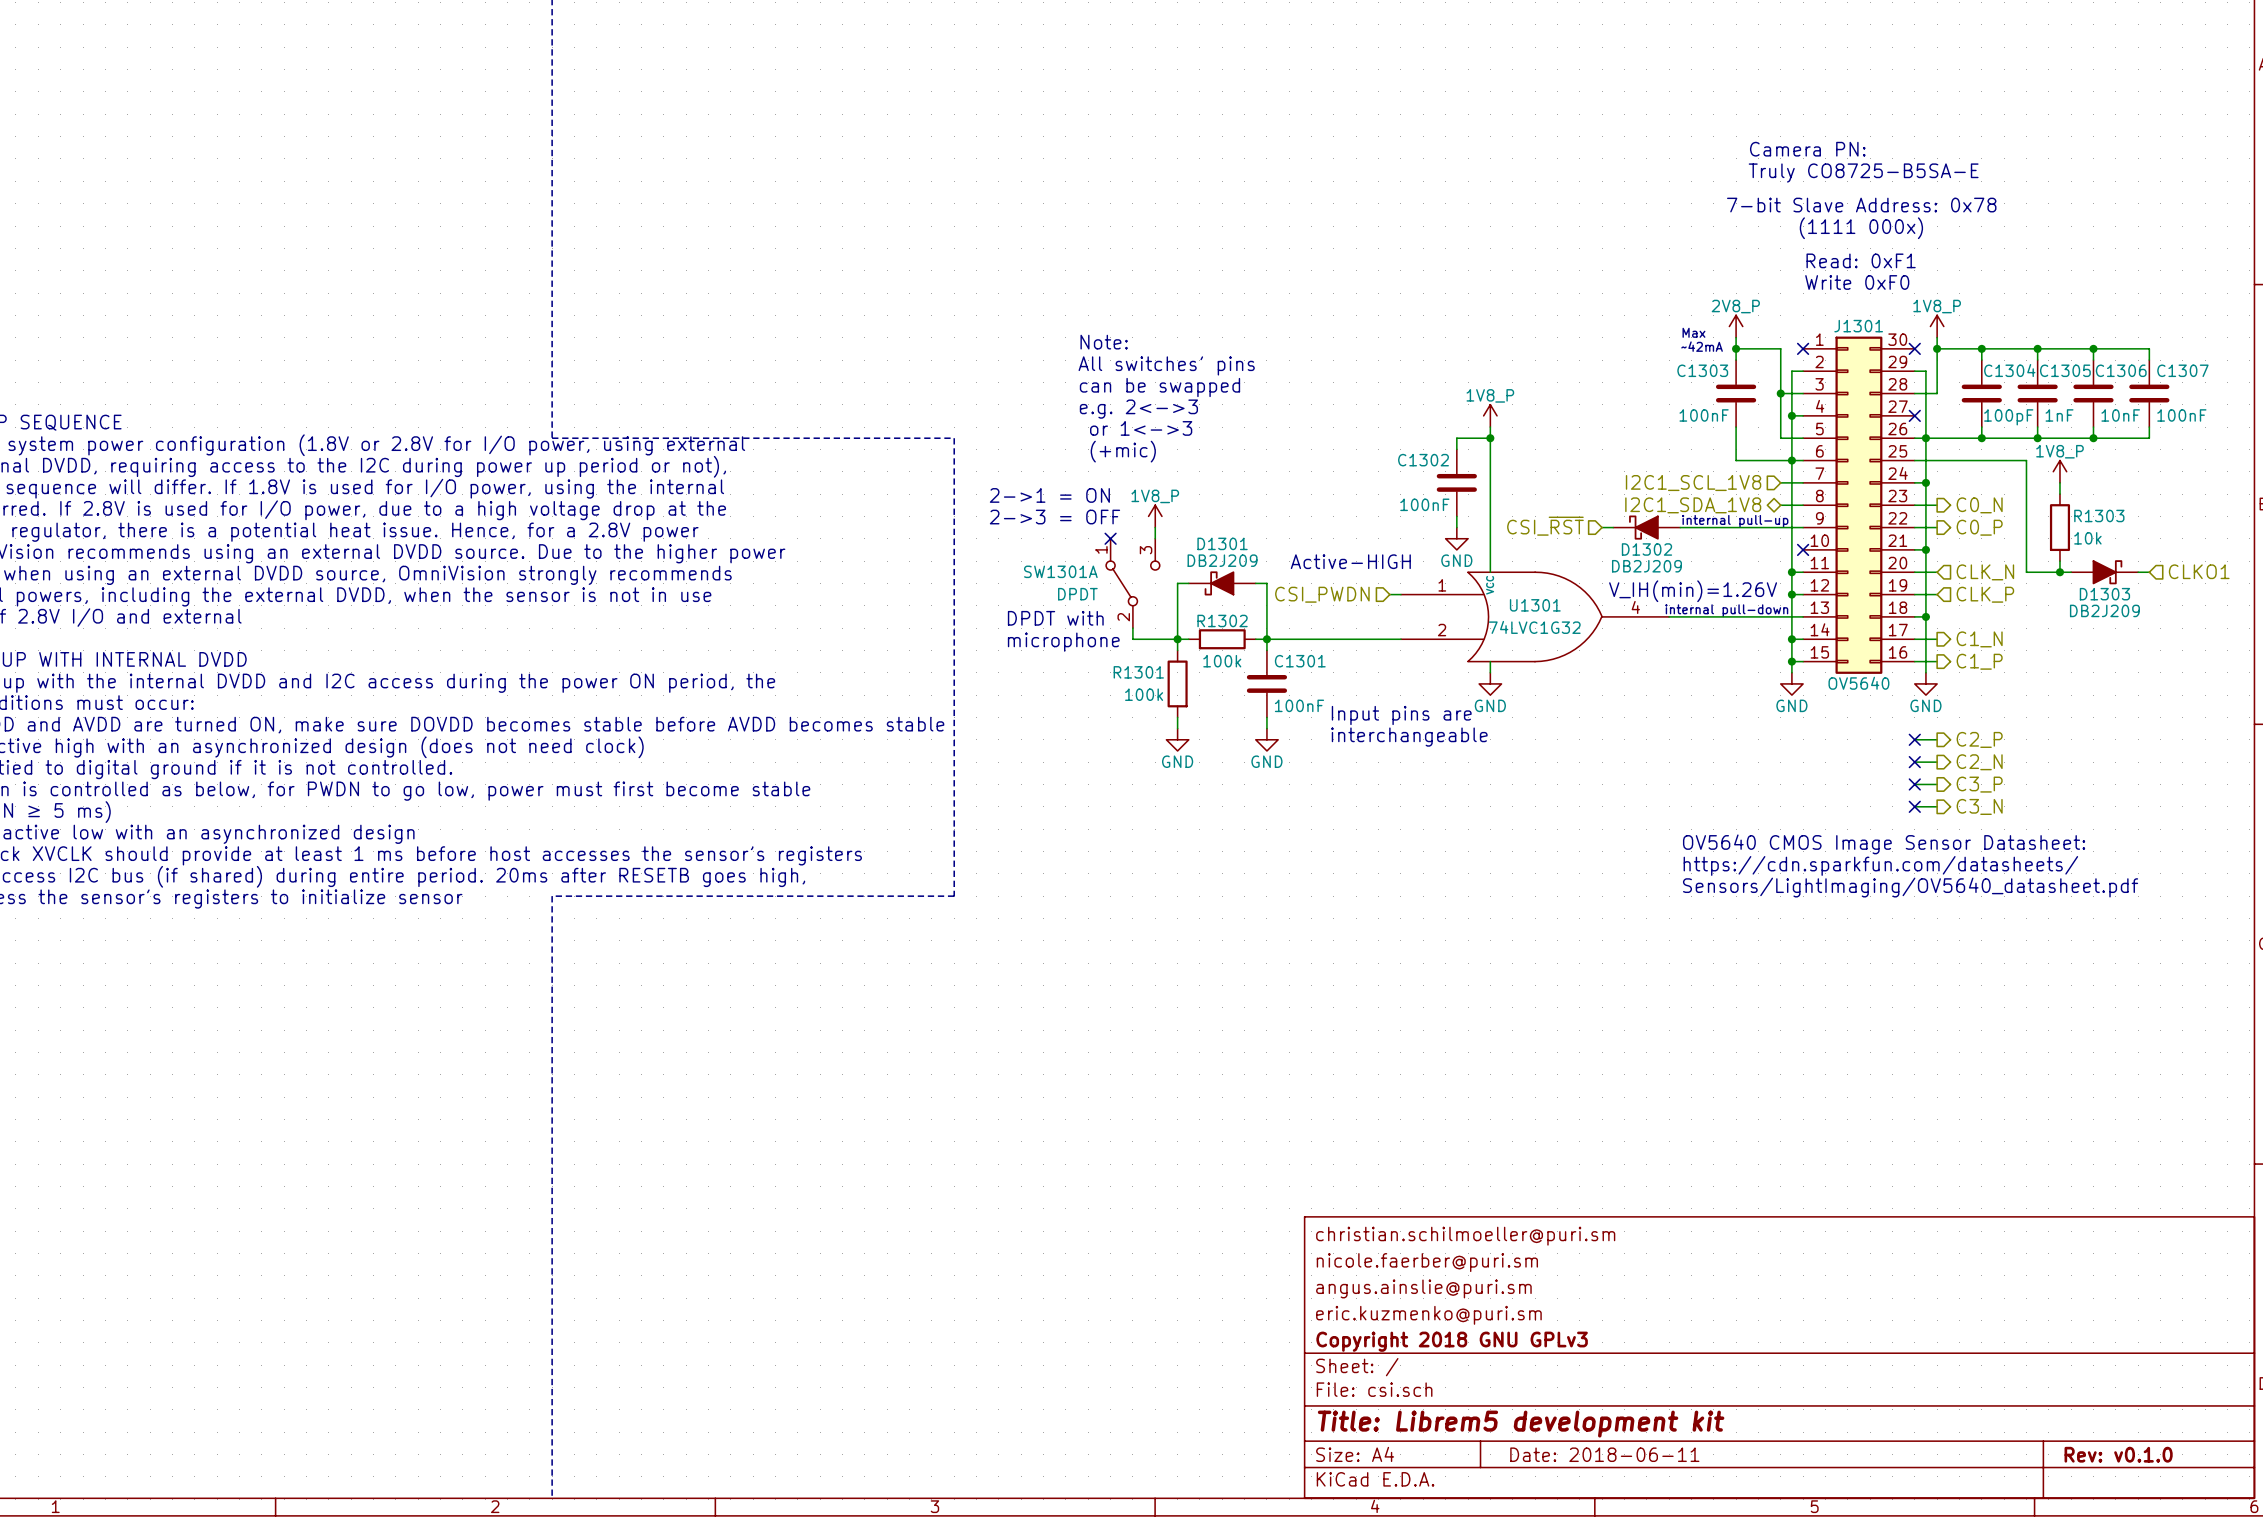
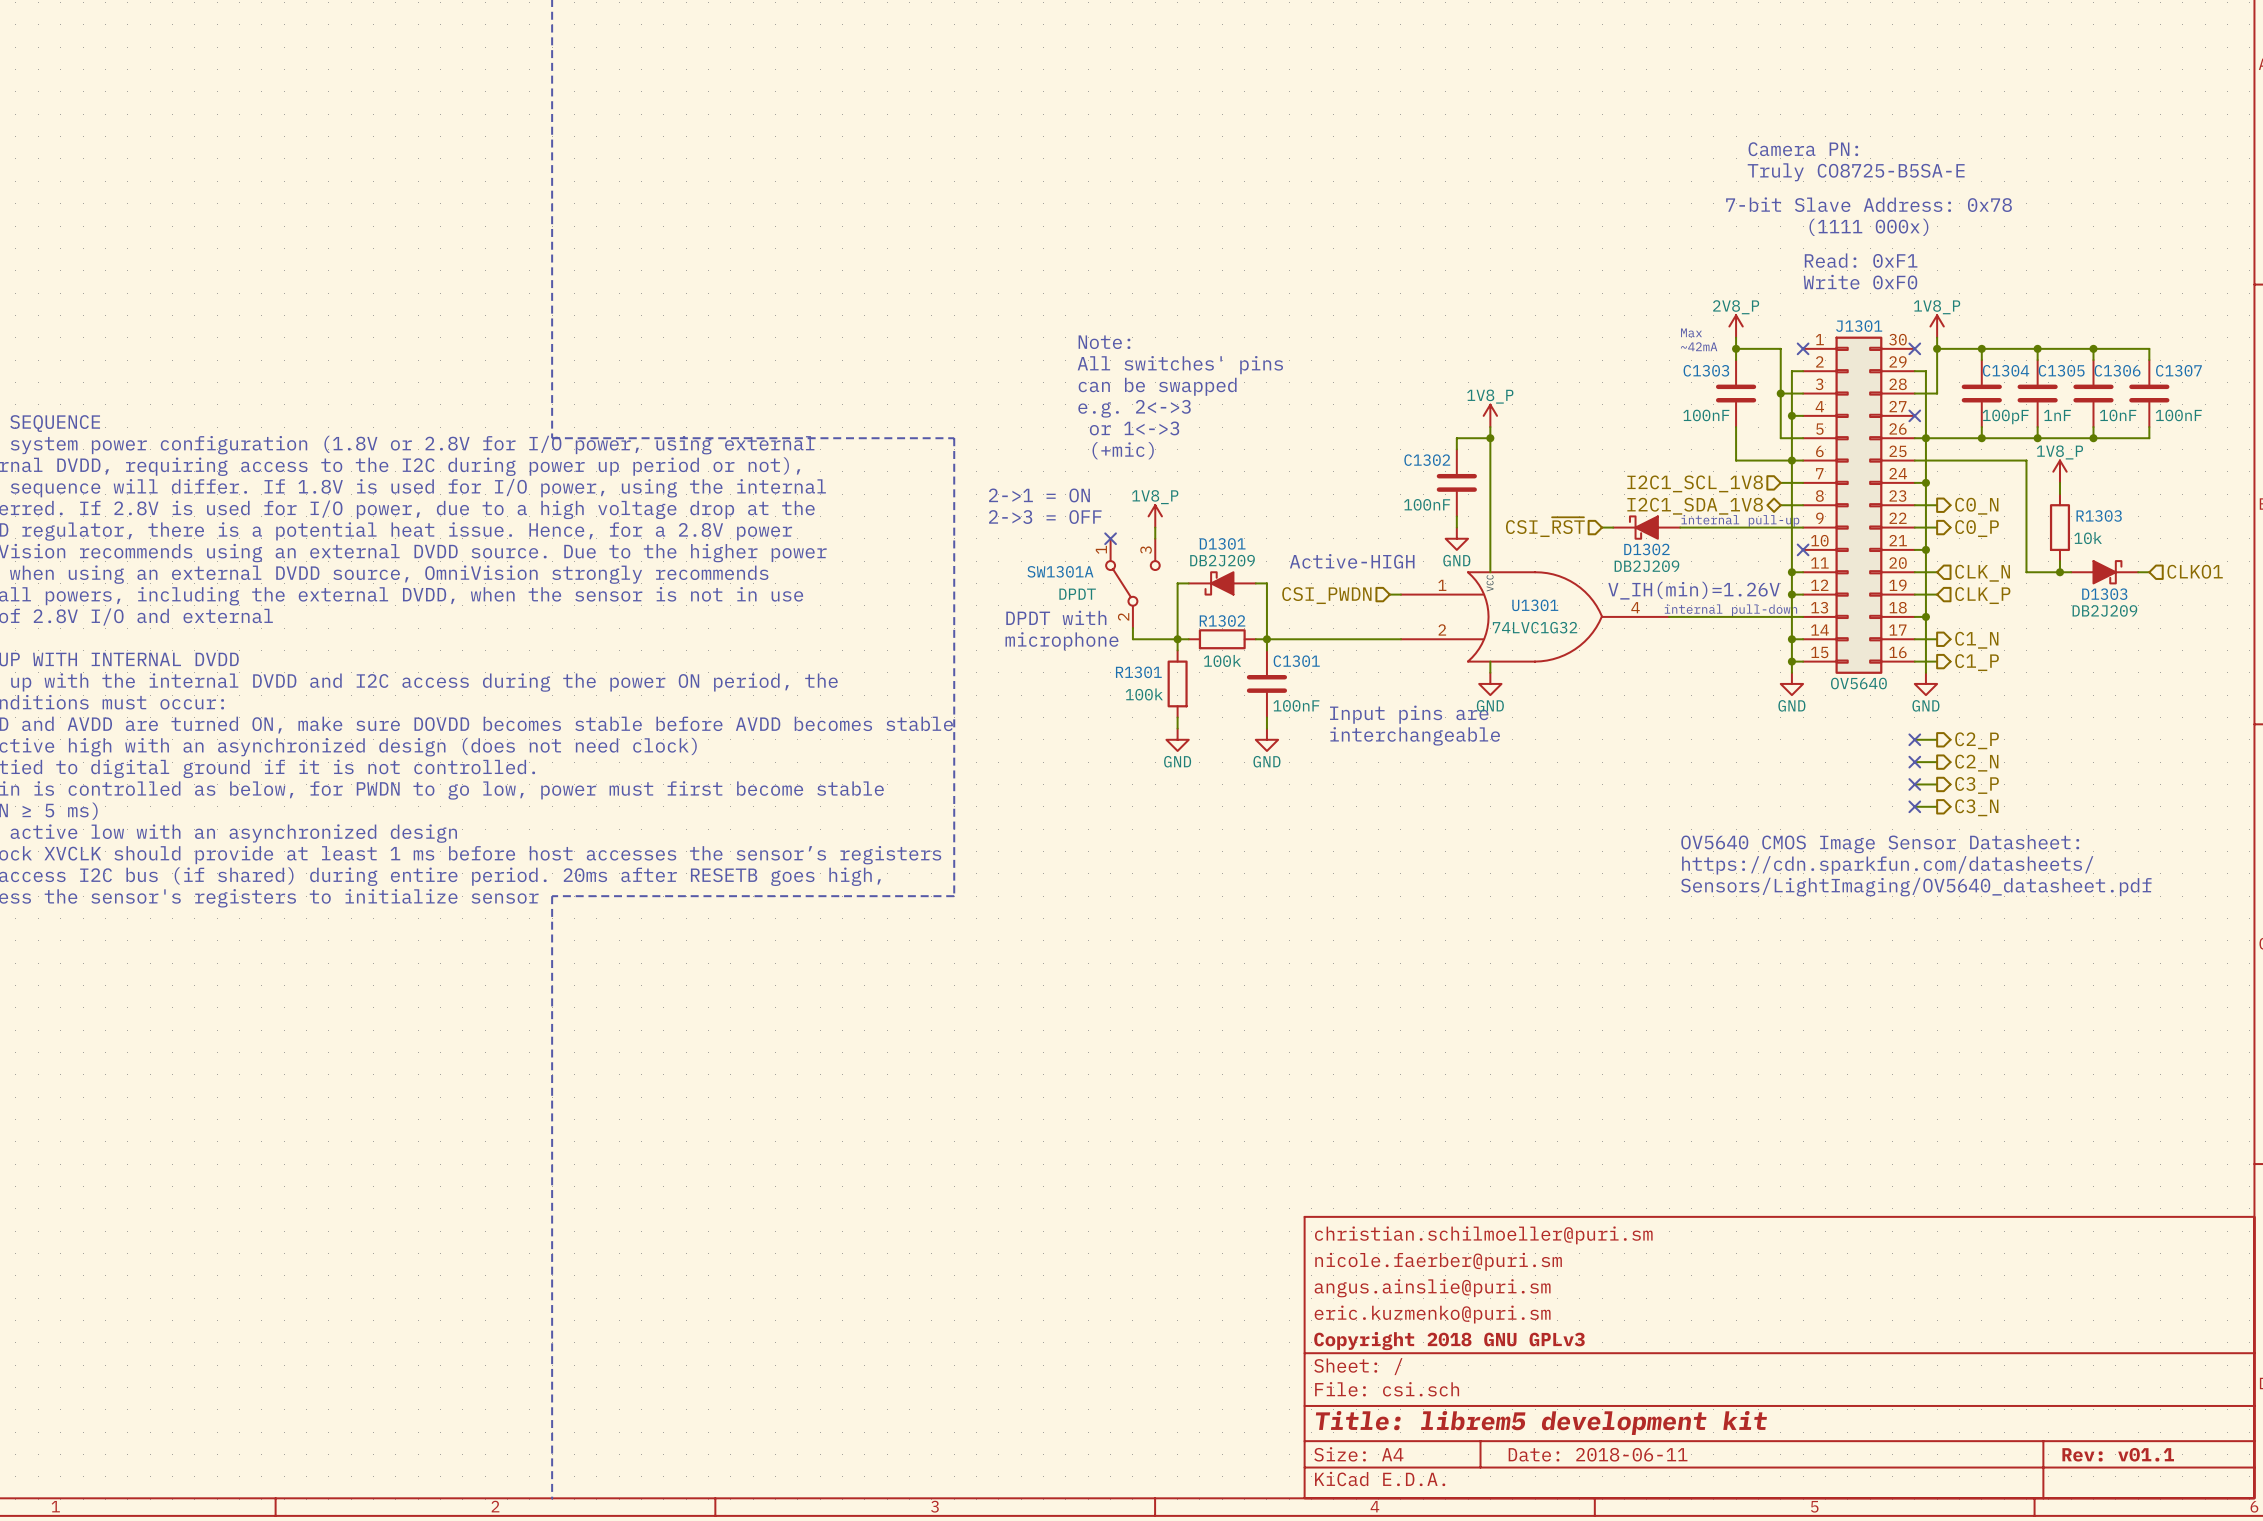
title block: Title: Librem5 development kit (1521, 1424) -> Title: librem5 development kit (1541, 1422)
title block: Rev: v0.1.0 (2118, 1454) -> Rev: v01.1 (2118, 1454)

